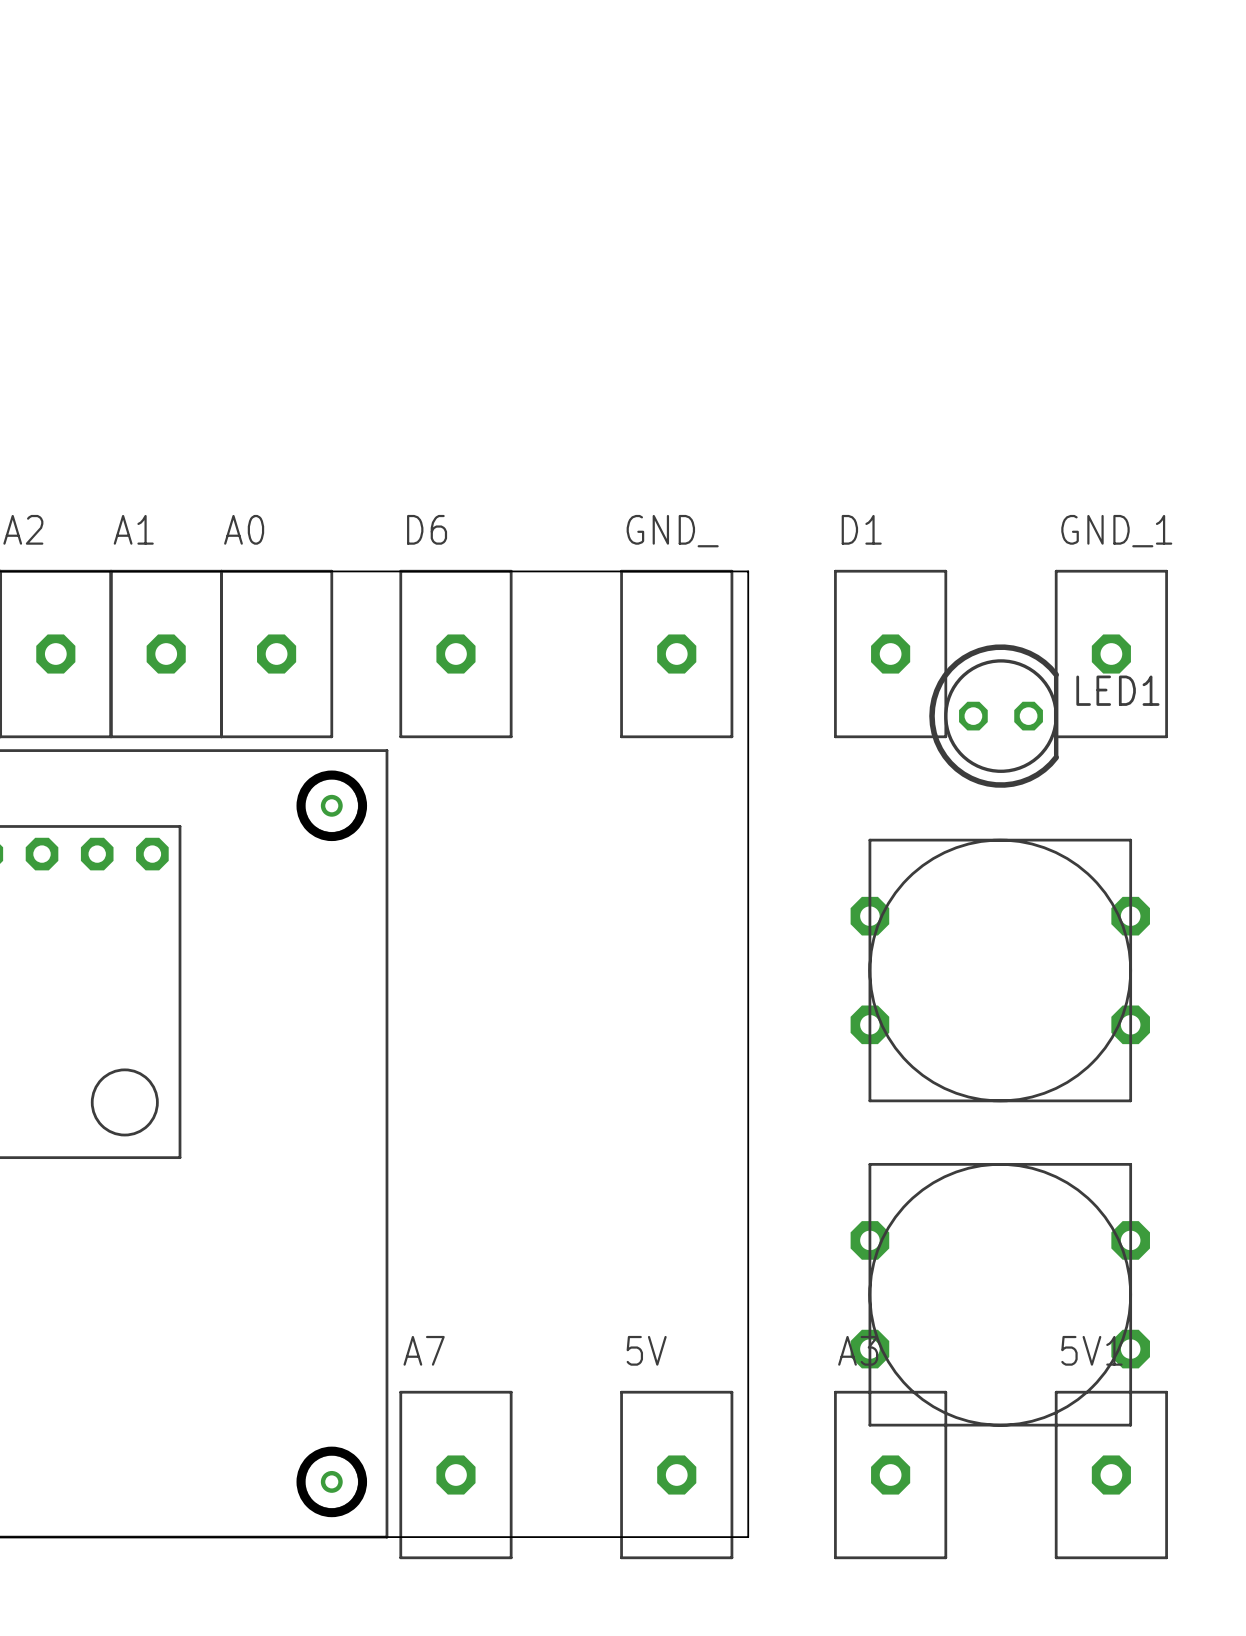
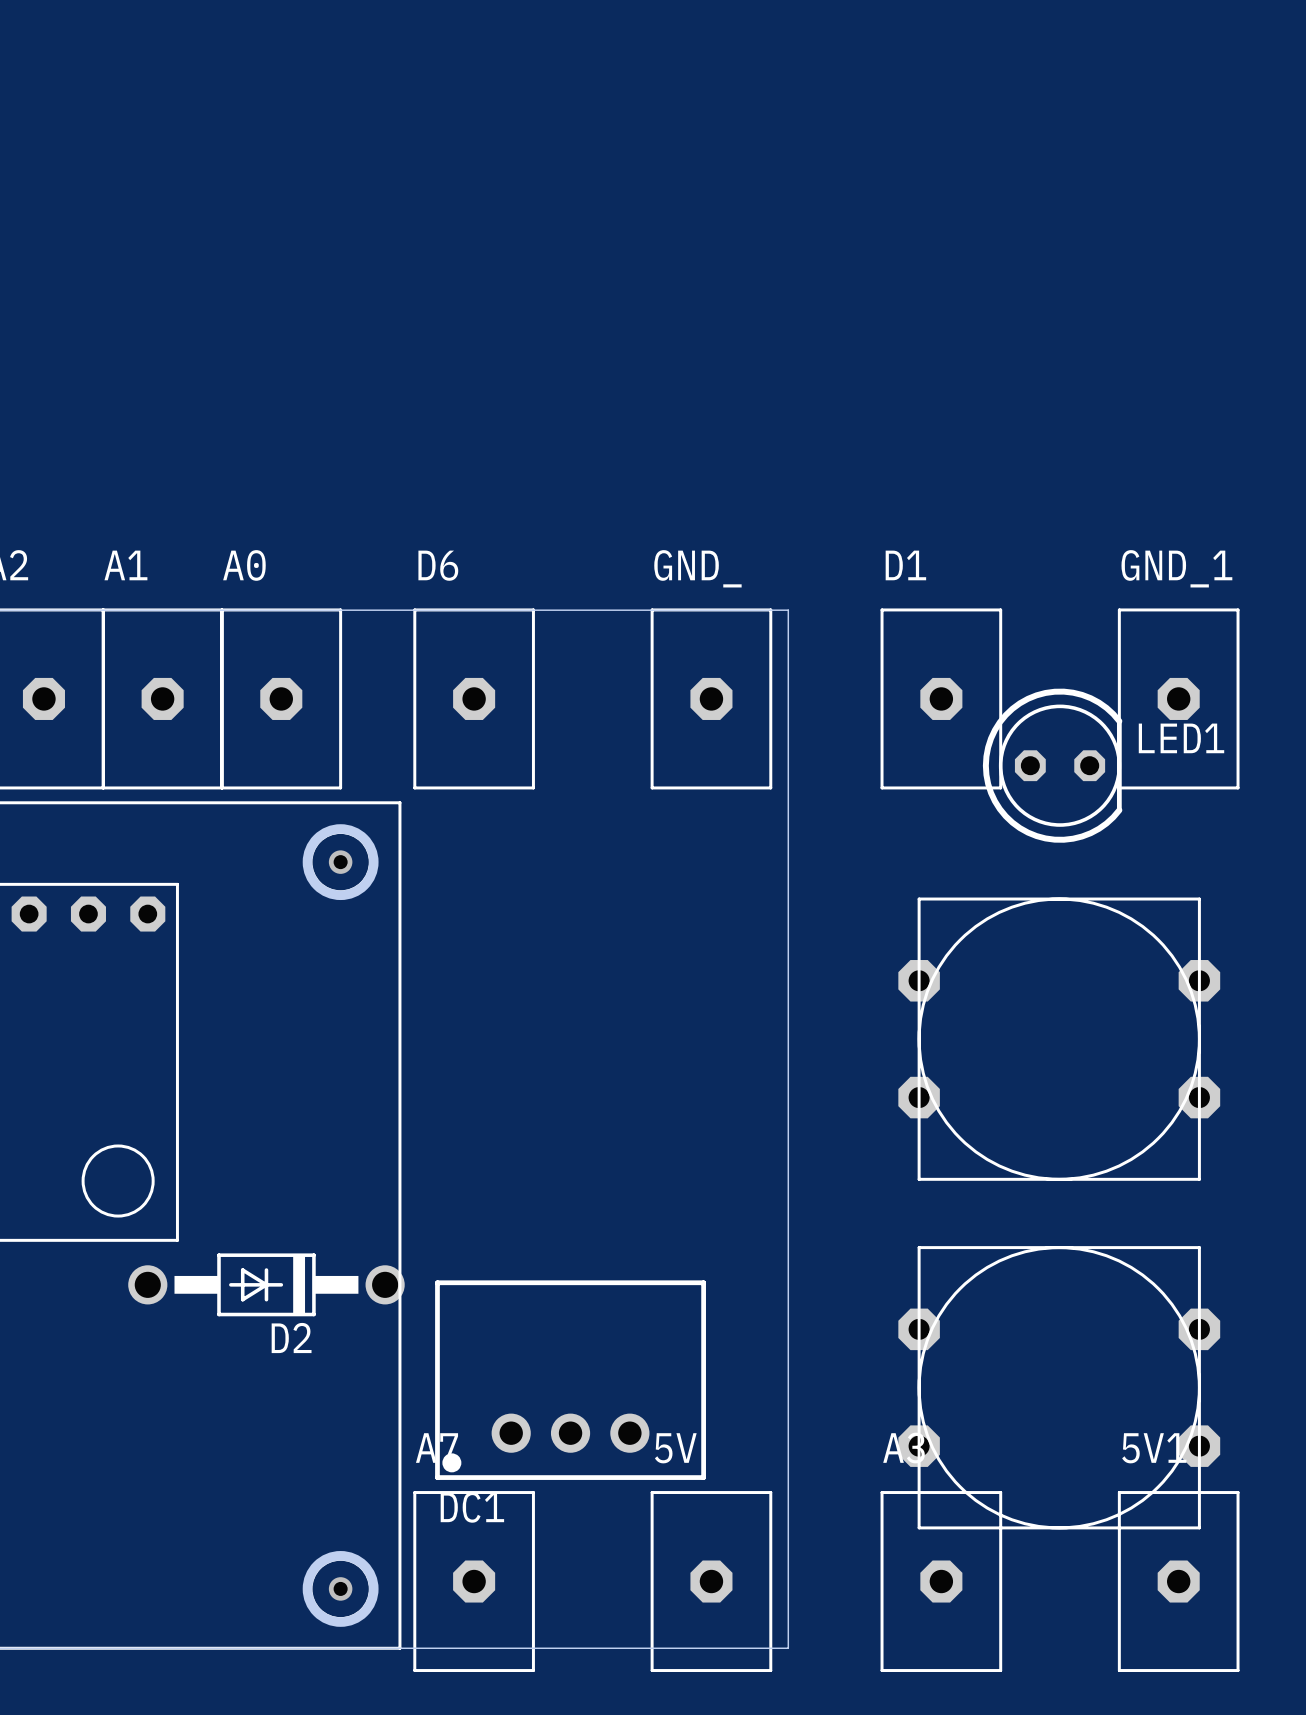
D2: none -> (266, 1284)
DC1: none -> (570, 1380)

